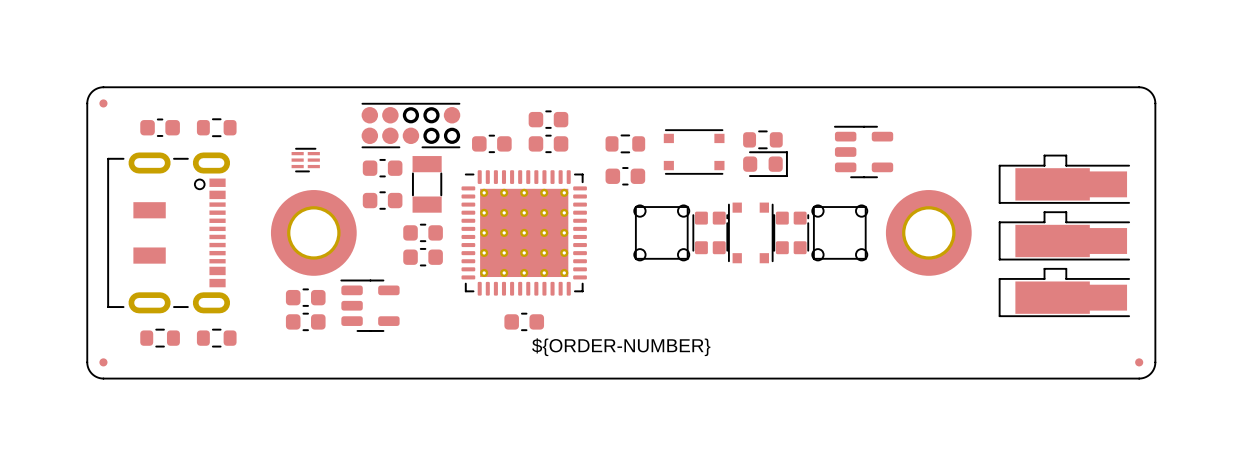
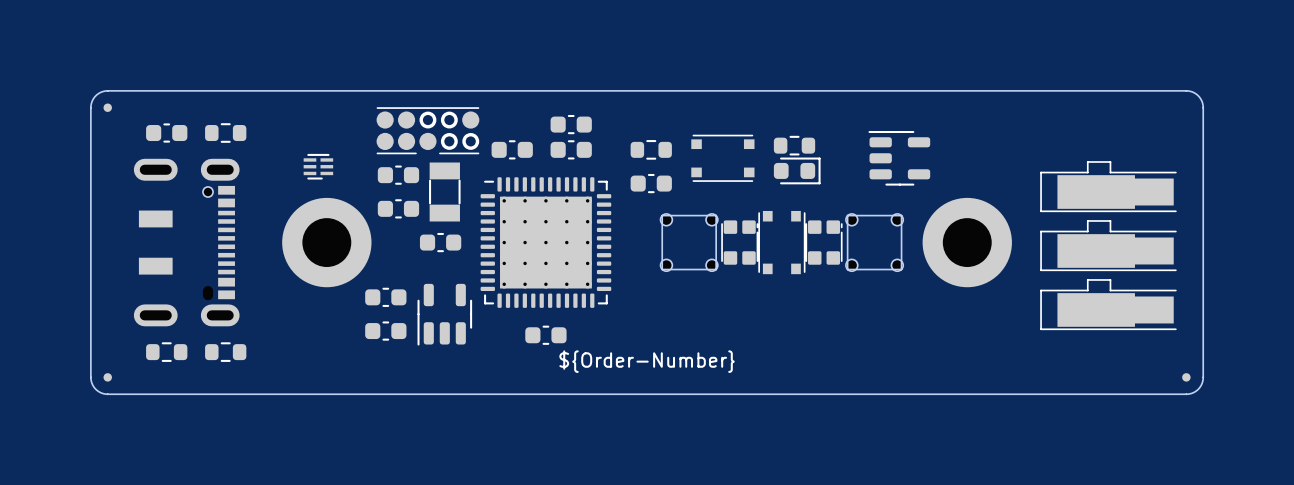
part footprint: [107, 152, 231, 314] -> [133, 158, 240, 327]
part: (423, 257) -> none
part: none -> (385, 297)
part: (305, 297) -> none
part rotation: 0° (369, 305) -> 90° counterclockwise (444, 314)
part position: (369, 305) -> (444, 314)
part: none -> (385, 331)
part: (305, 321) -> none
drawing shape: [532, 338, 711, 357] -> [559, 350, 735, 373]

